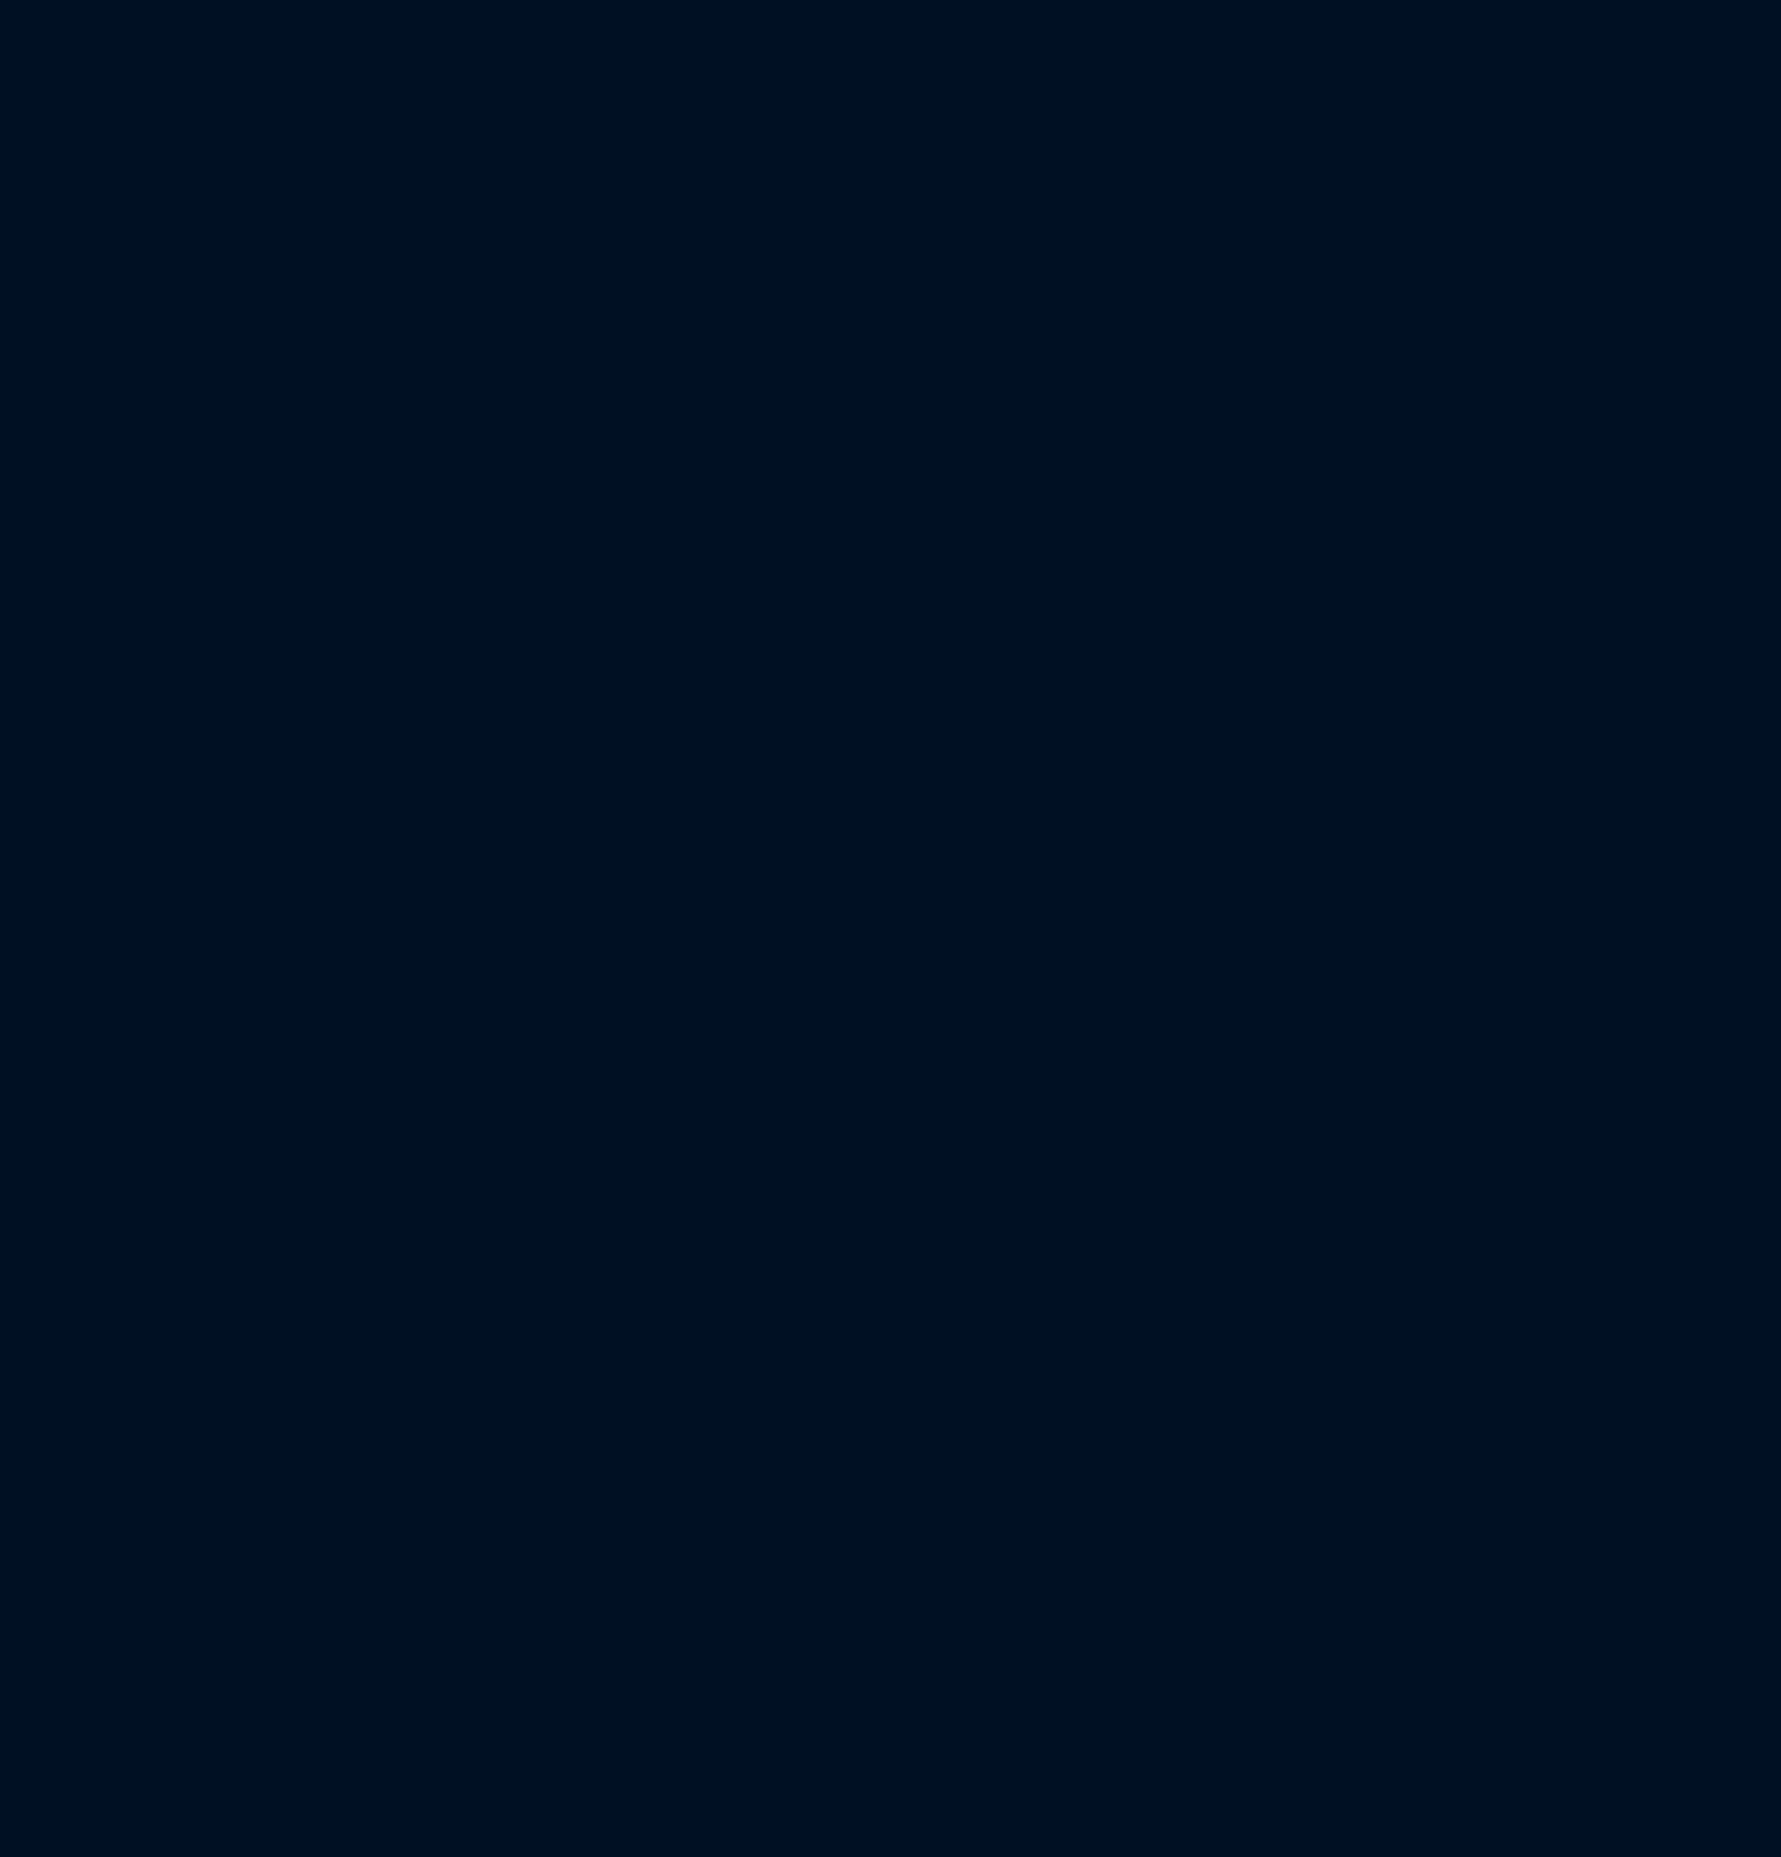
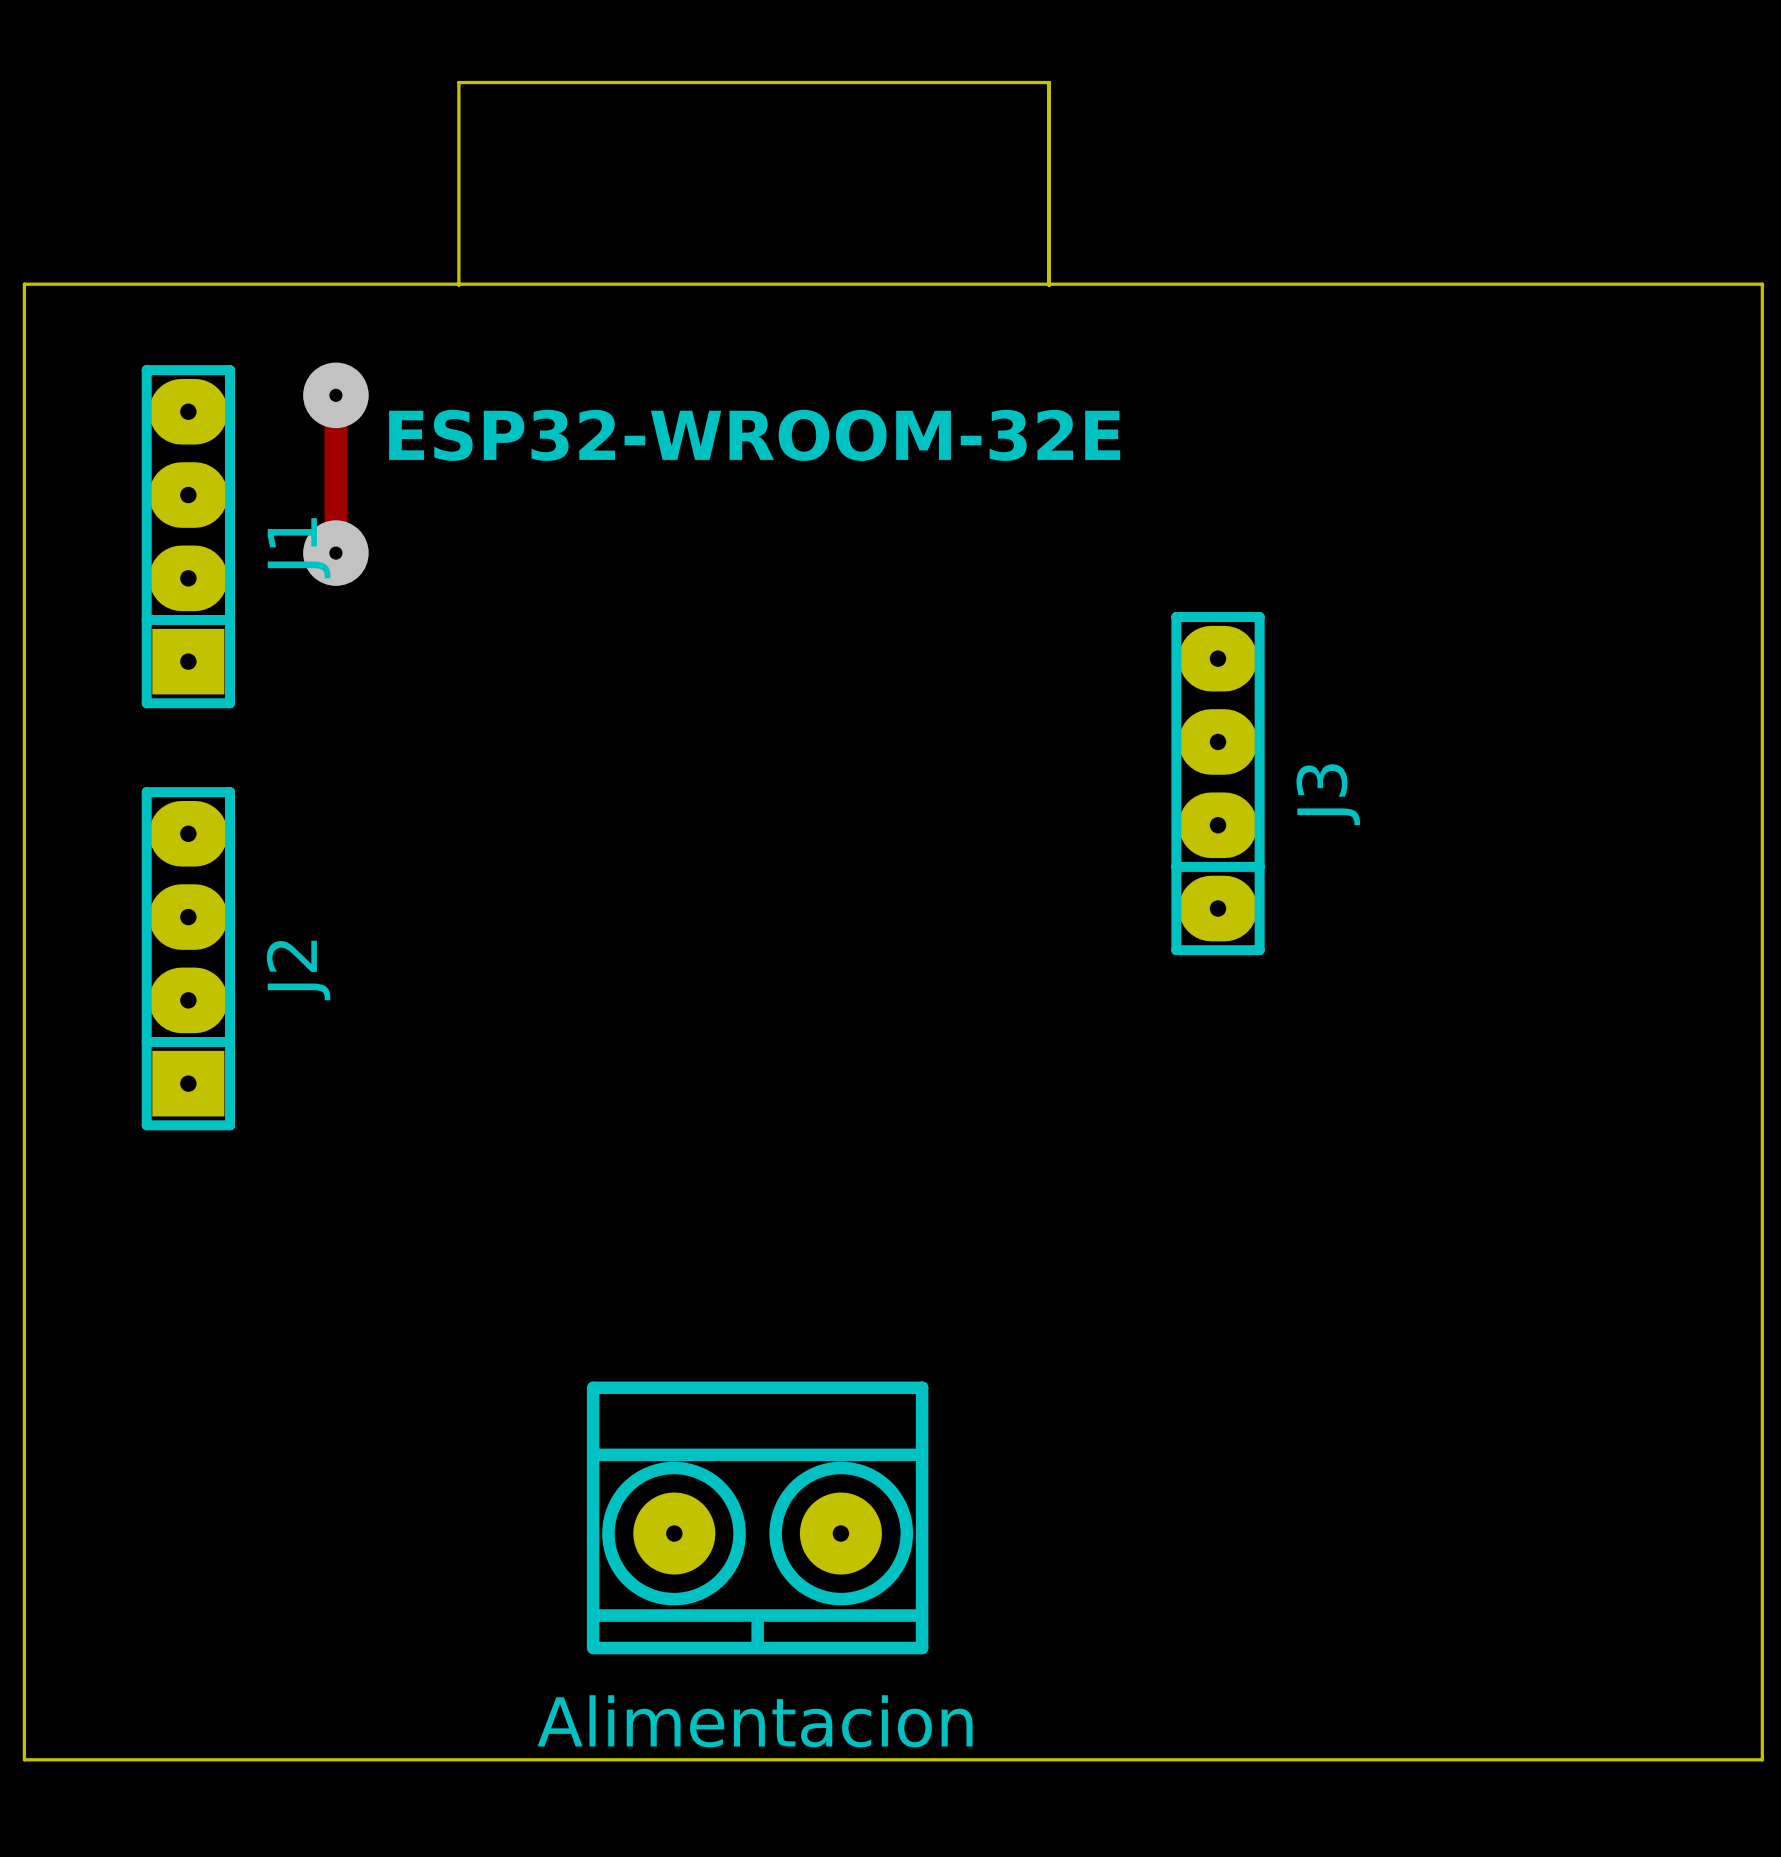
part: none -> ESP32-WROOM-32E (754, 184)
board edge: none -> (24, 284) (1762, 284) (1762, 1759) (24, 1759) (24, 284)
track: none -> (335, 395) (335, 553)
via: none -> (335, 395)
J1: none -> (188, 536)
via: none -> (335, 553)
J3: none -> (1218, 783)
J2: none -> (188, 958)
part: none -> Alimentacion (757, 1517)

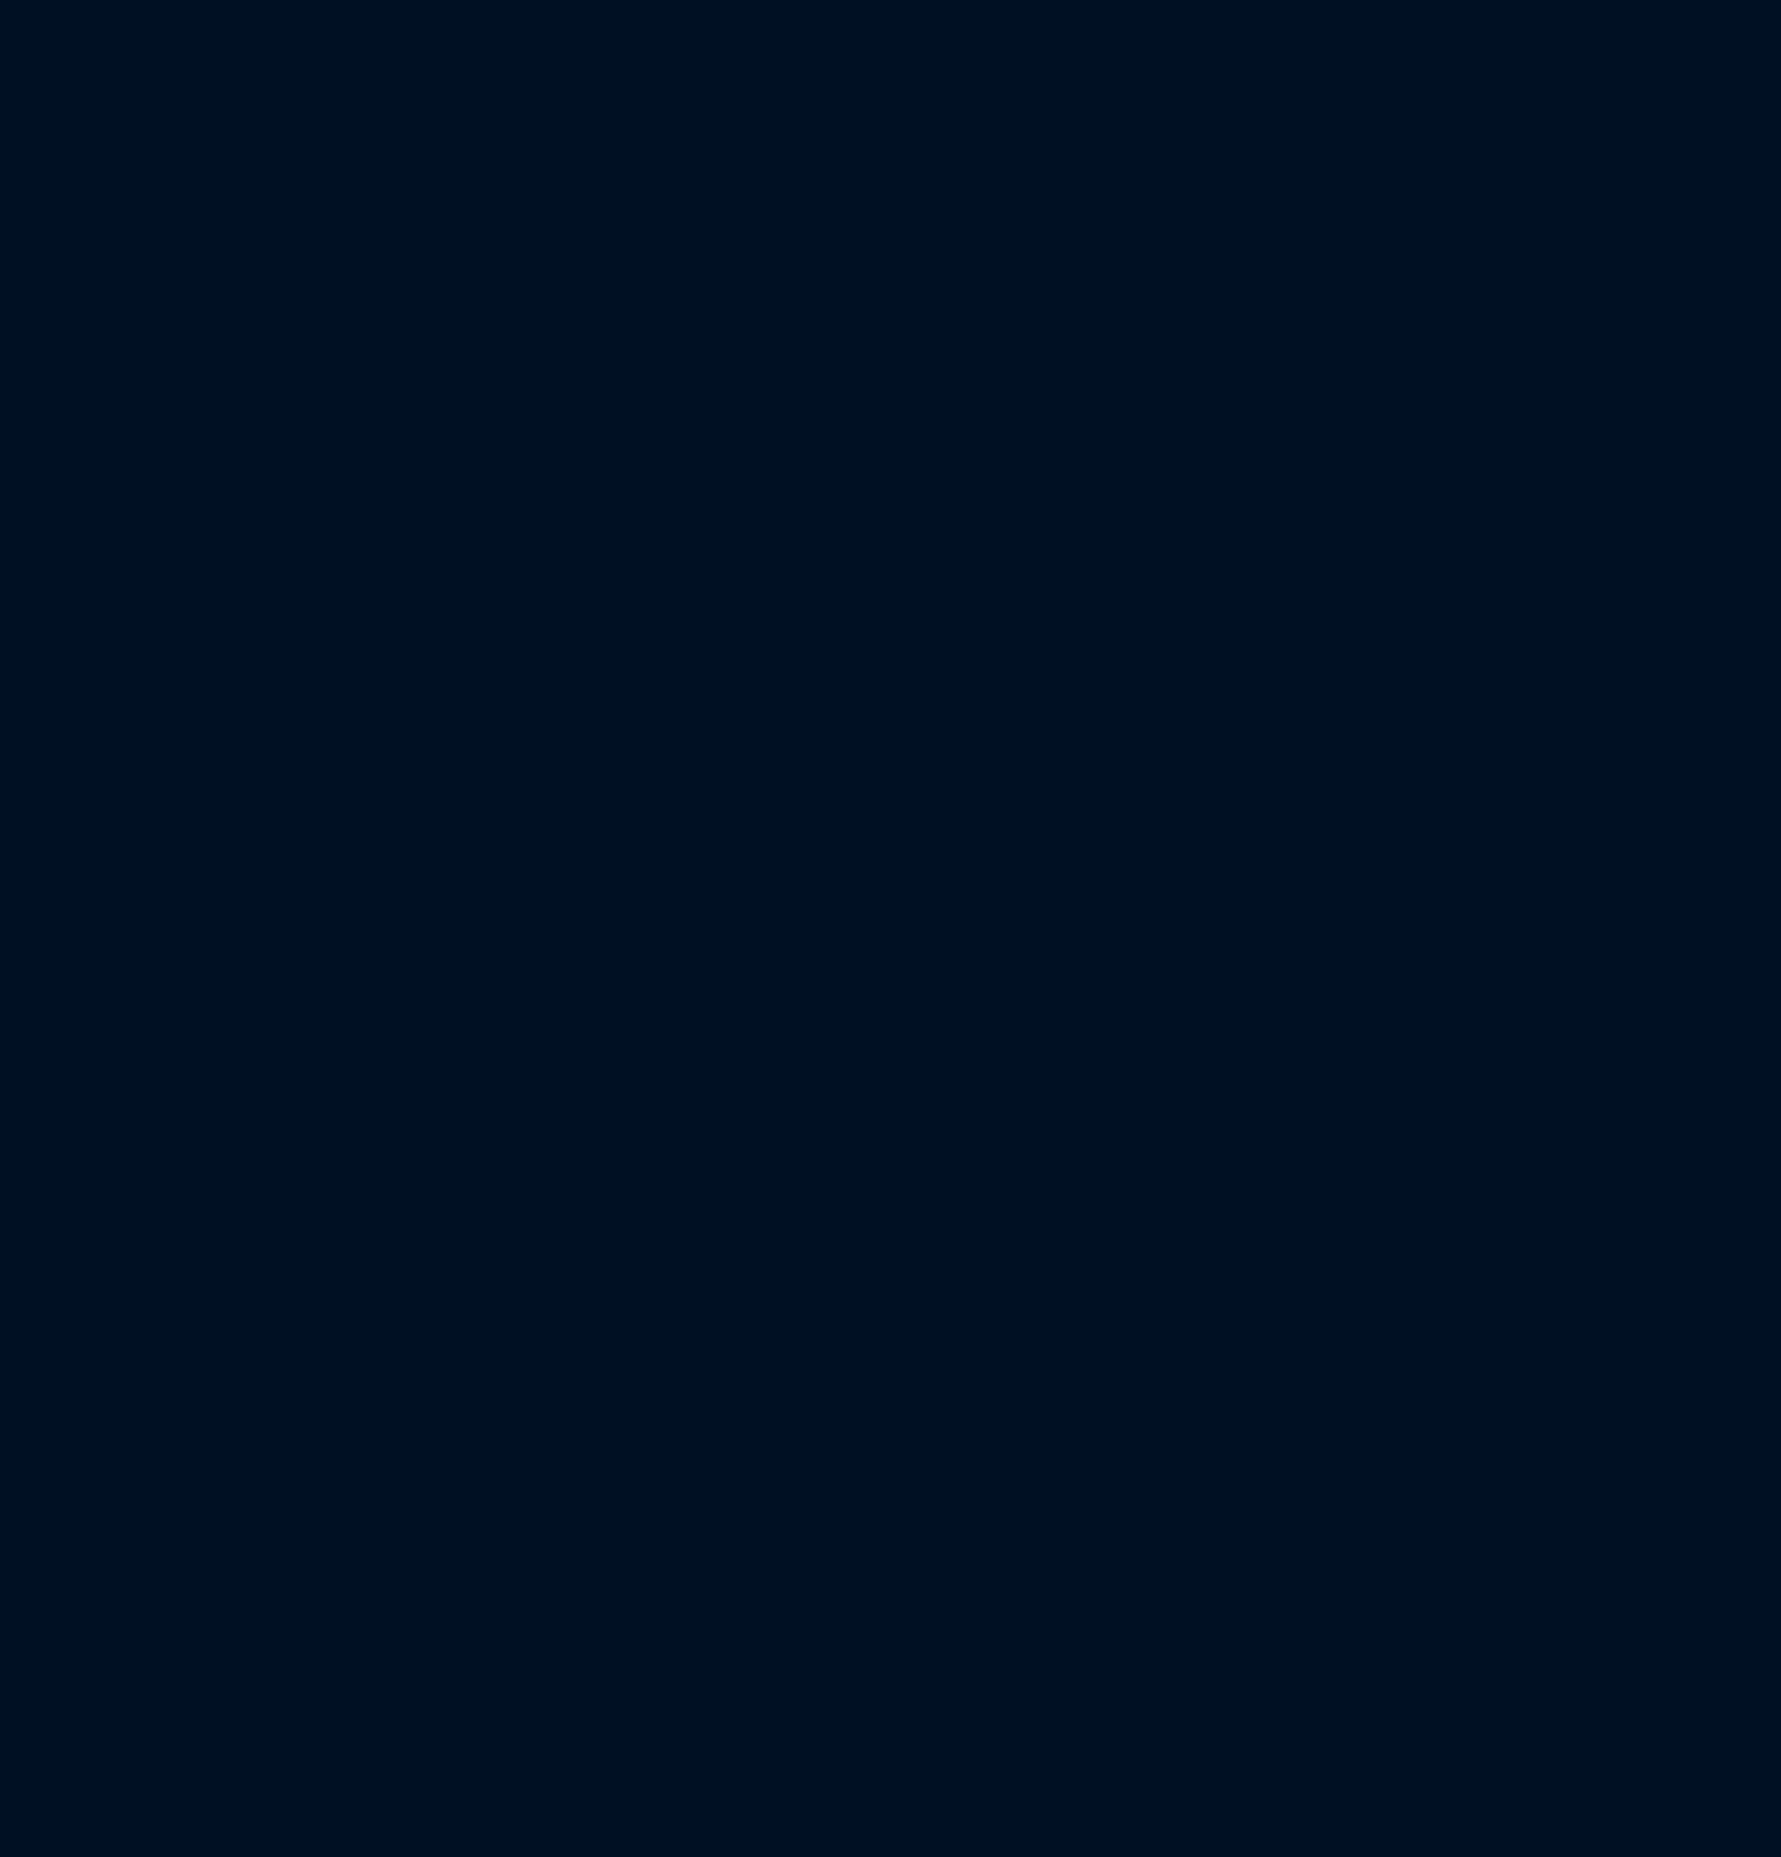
part: ESP32-WROOM-32E (754, 184) -> none
board edge: (24, 284) (1762, 284) (1762, 1759) (24, 1759) (24, 284) -> none
track: (335, 395) (335, 553) -> none
via: (335, 395) -> none
J1: (188, 536) -> none
via: (335, 553) -> none
J3: (1218, 783) -> none
J2: (188, 958) -> none
part: Alimentacion (757, 1517) -> none

